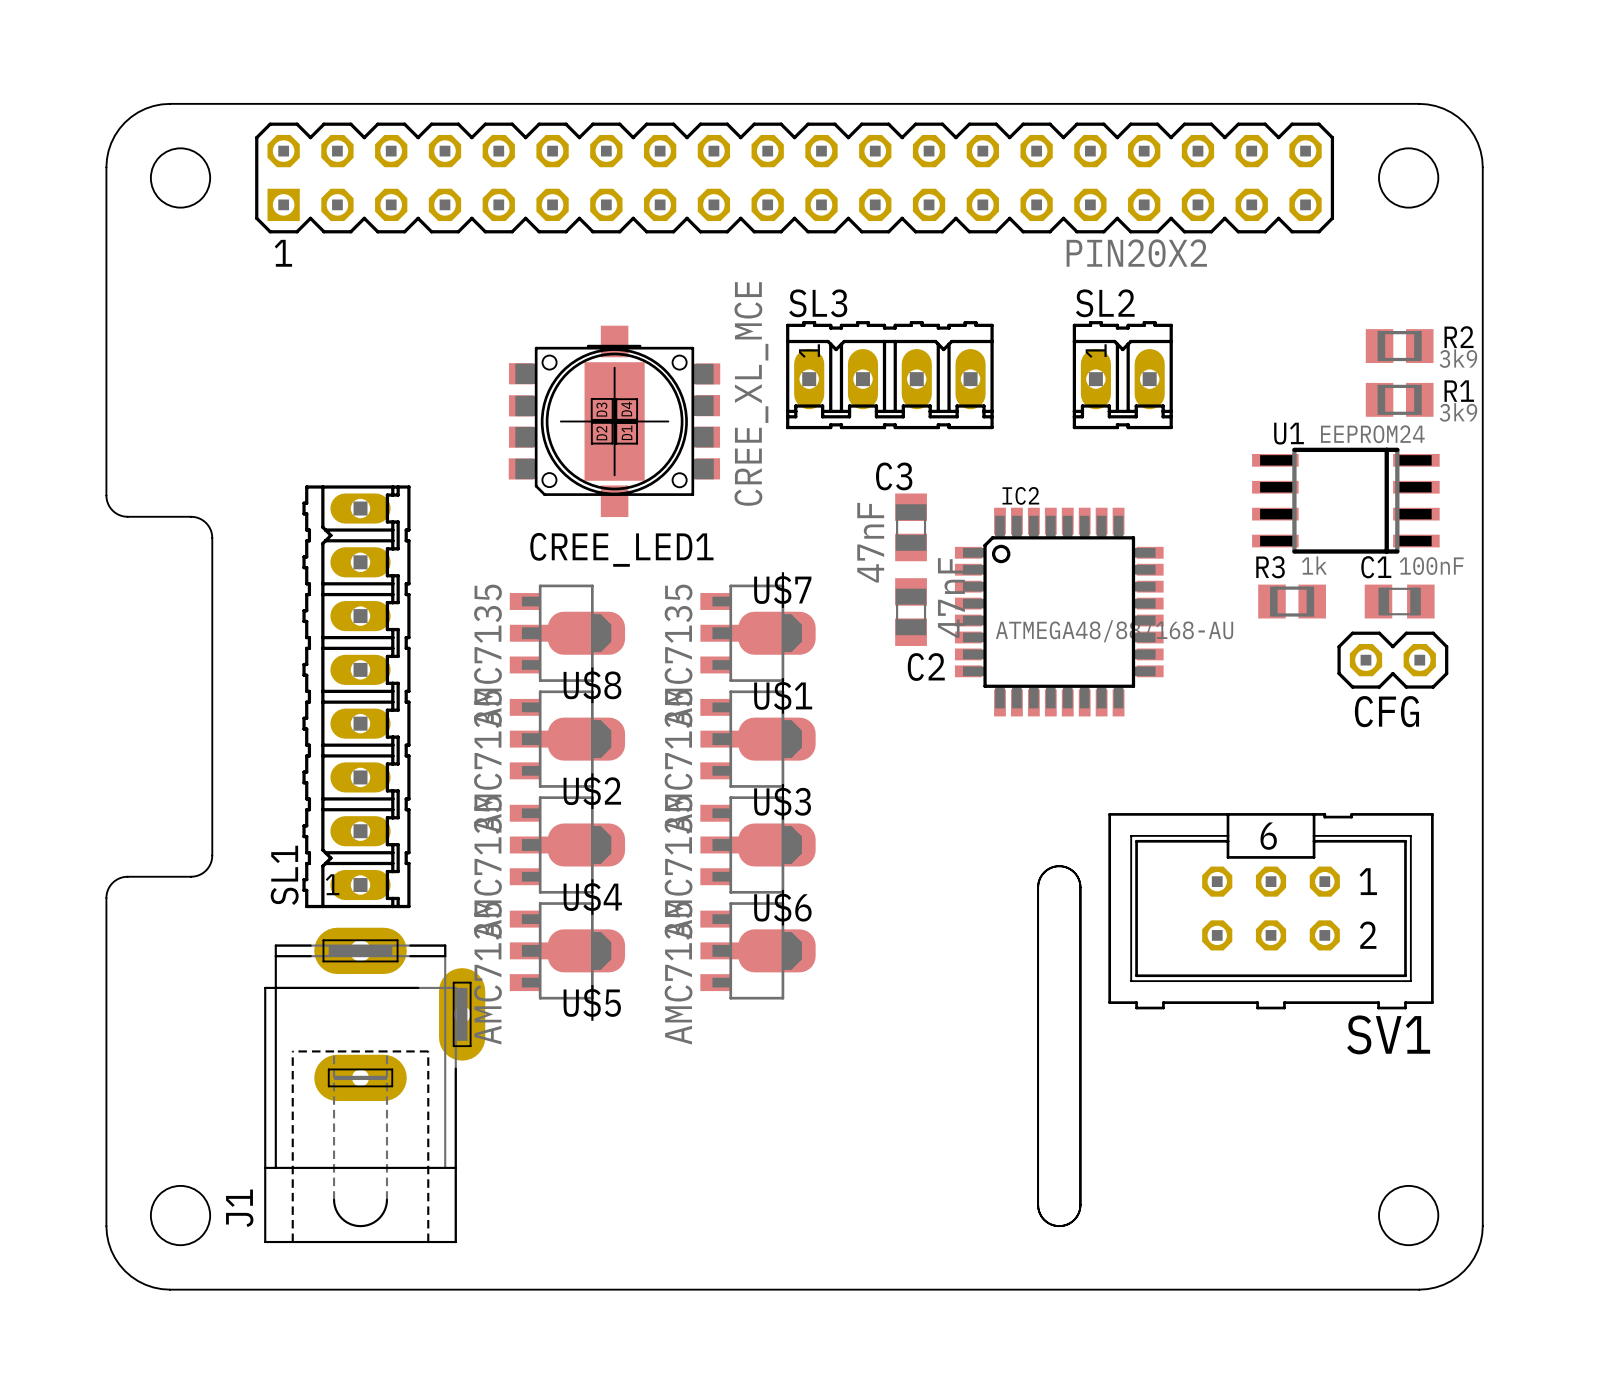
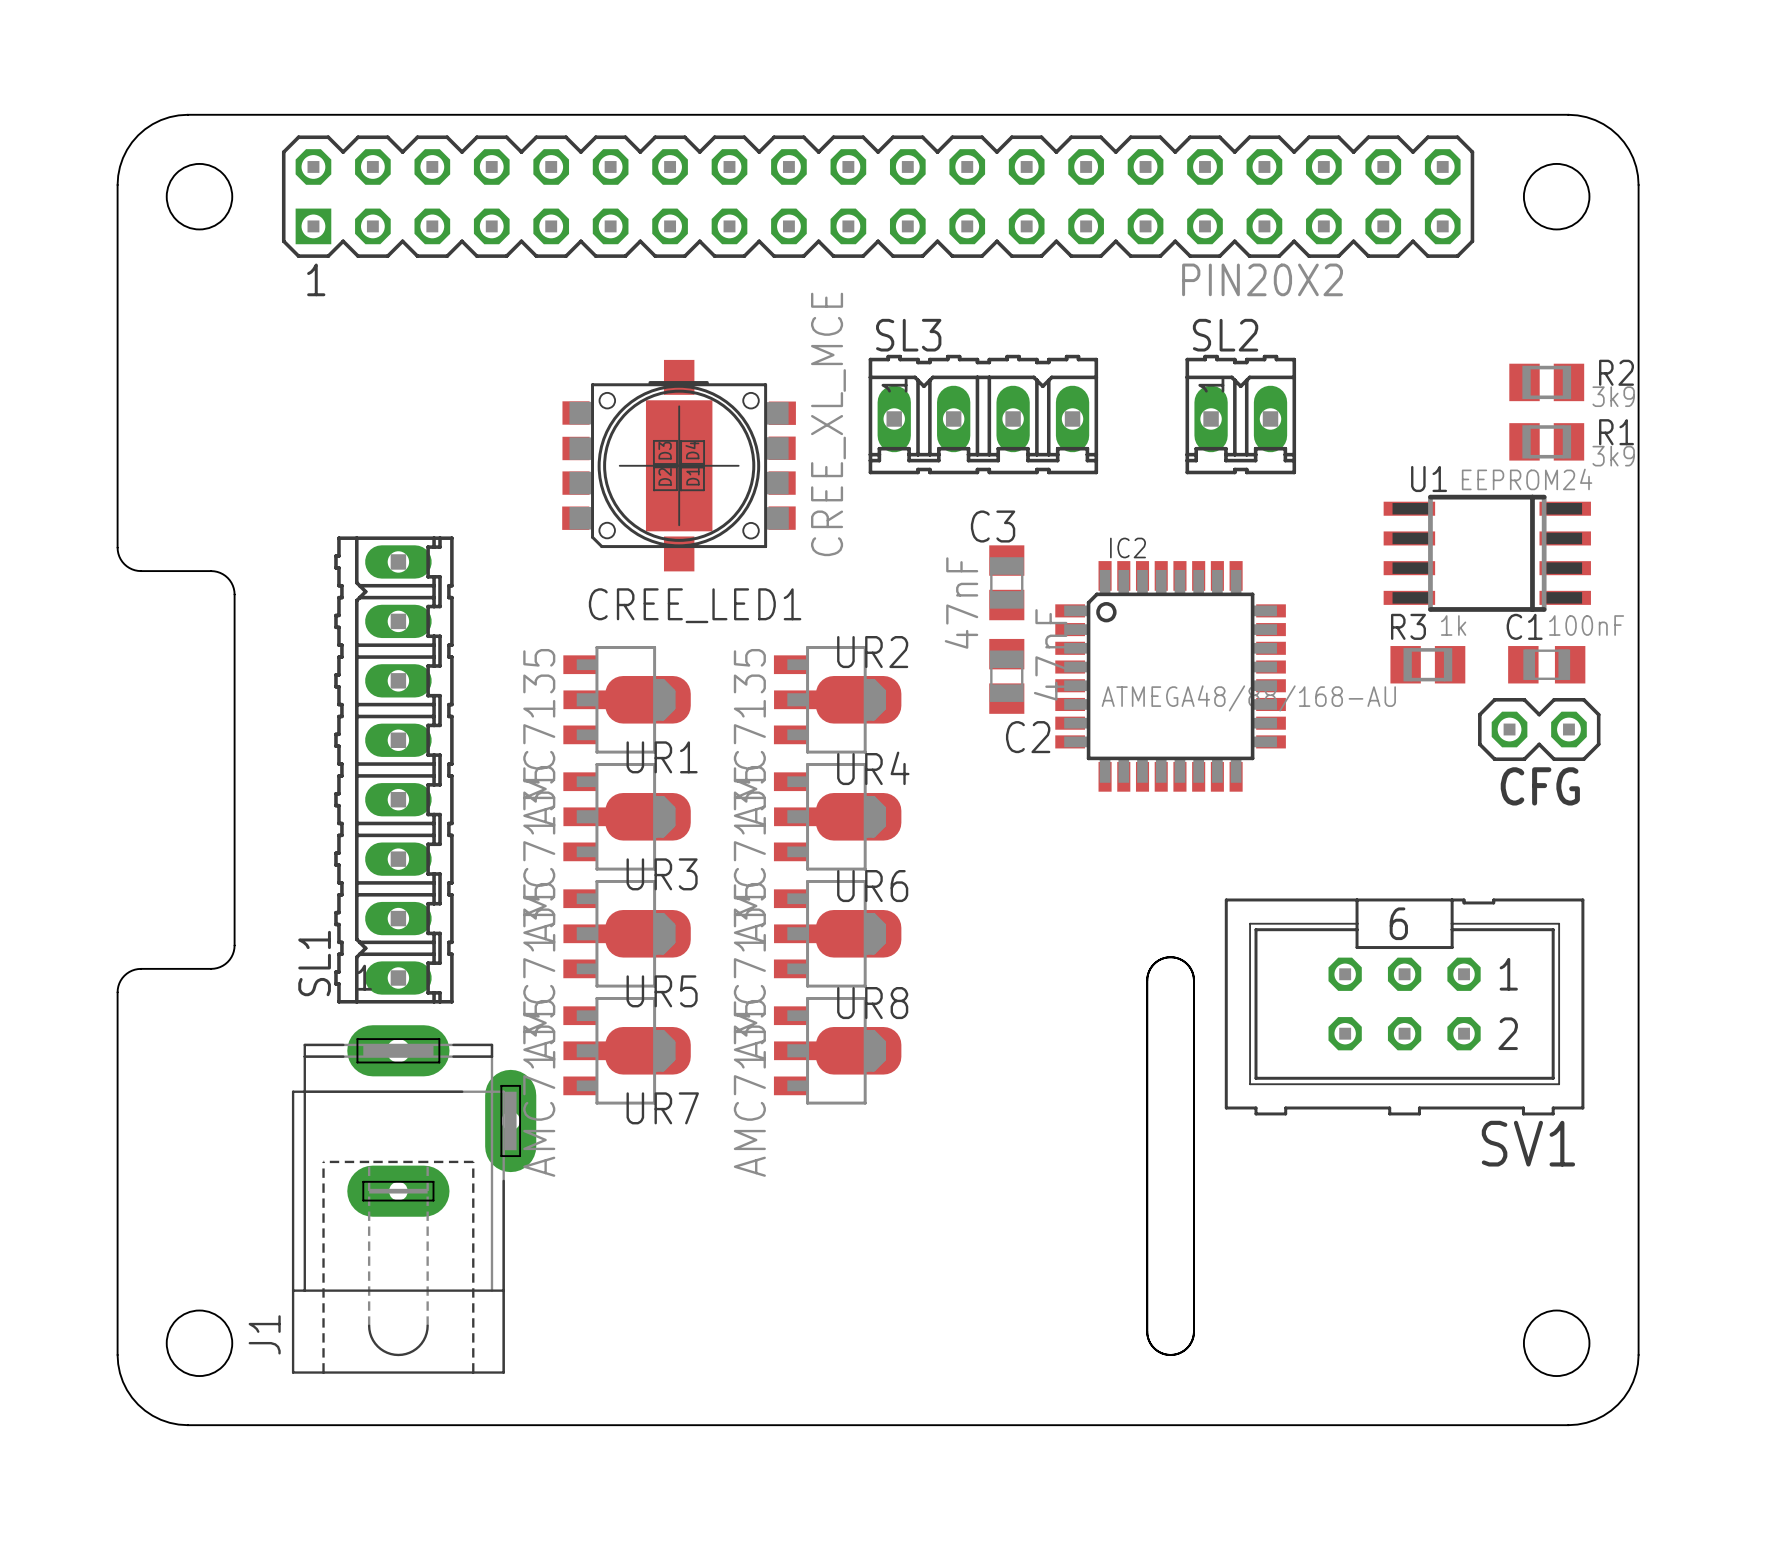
U$7 name: U$7 (782, 590) -> UR2 (872, 652)
U$8 name: U$8 (592, 685) -> UR1 (662, 757)
U$1 name: U$1 (783, 695) -> UR4 (873, 768)
U$2 name: U$2 (592, 791) -> UR3 (662, 874)
U$3 name: U$3 (782, 801) -> UR6 (872, 886)
U$4 name: U$4 (592, 897) -> UR5 (662, 991)
U$6 name: U$6 (782, 907) -> UR8 (872, 1003)
U$5 name: U$5 (592, 1002) -> UR7 (662, 1108)

